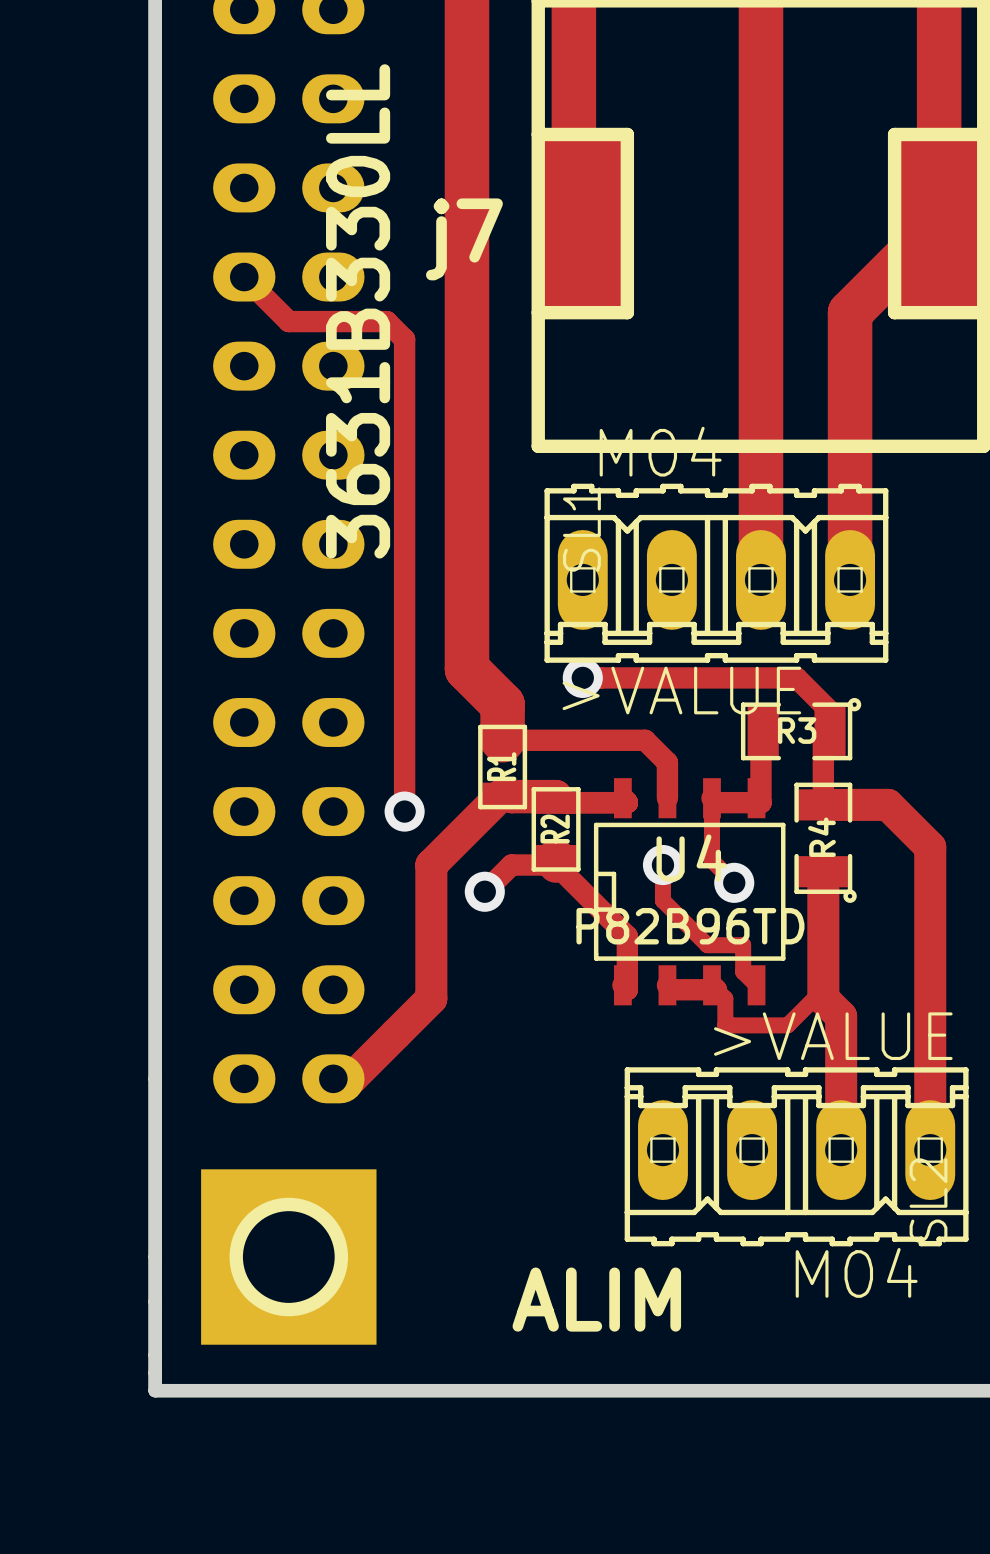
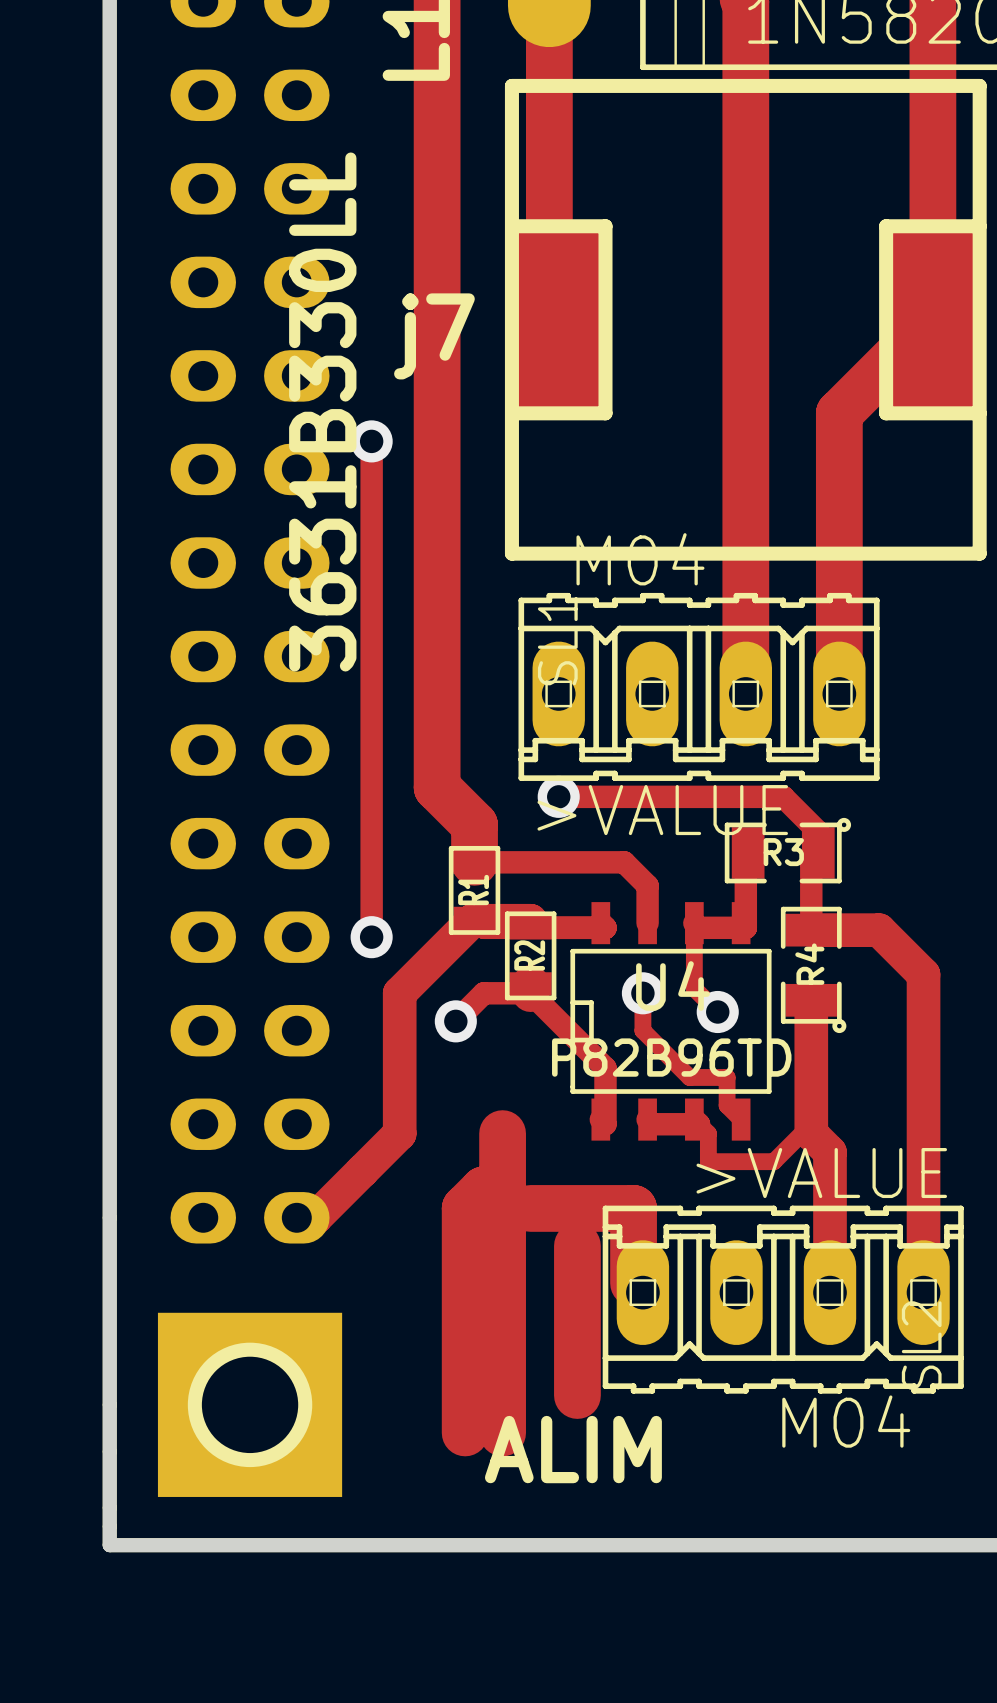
track: (244, 277) (288, 321) (386, 321) (404, 339) -> none
via: none -> (371, 441)
track: none -> (502, 1133) (502, 1432)
track: none -> (502, 1189) (483, 1189) (465, 1208) (465, 1432)
track: none -> (530, 1208) (633, 1208) (633, 1283)
track: none -> (577, 1245) (577, 1395)

